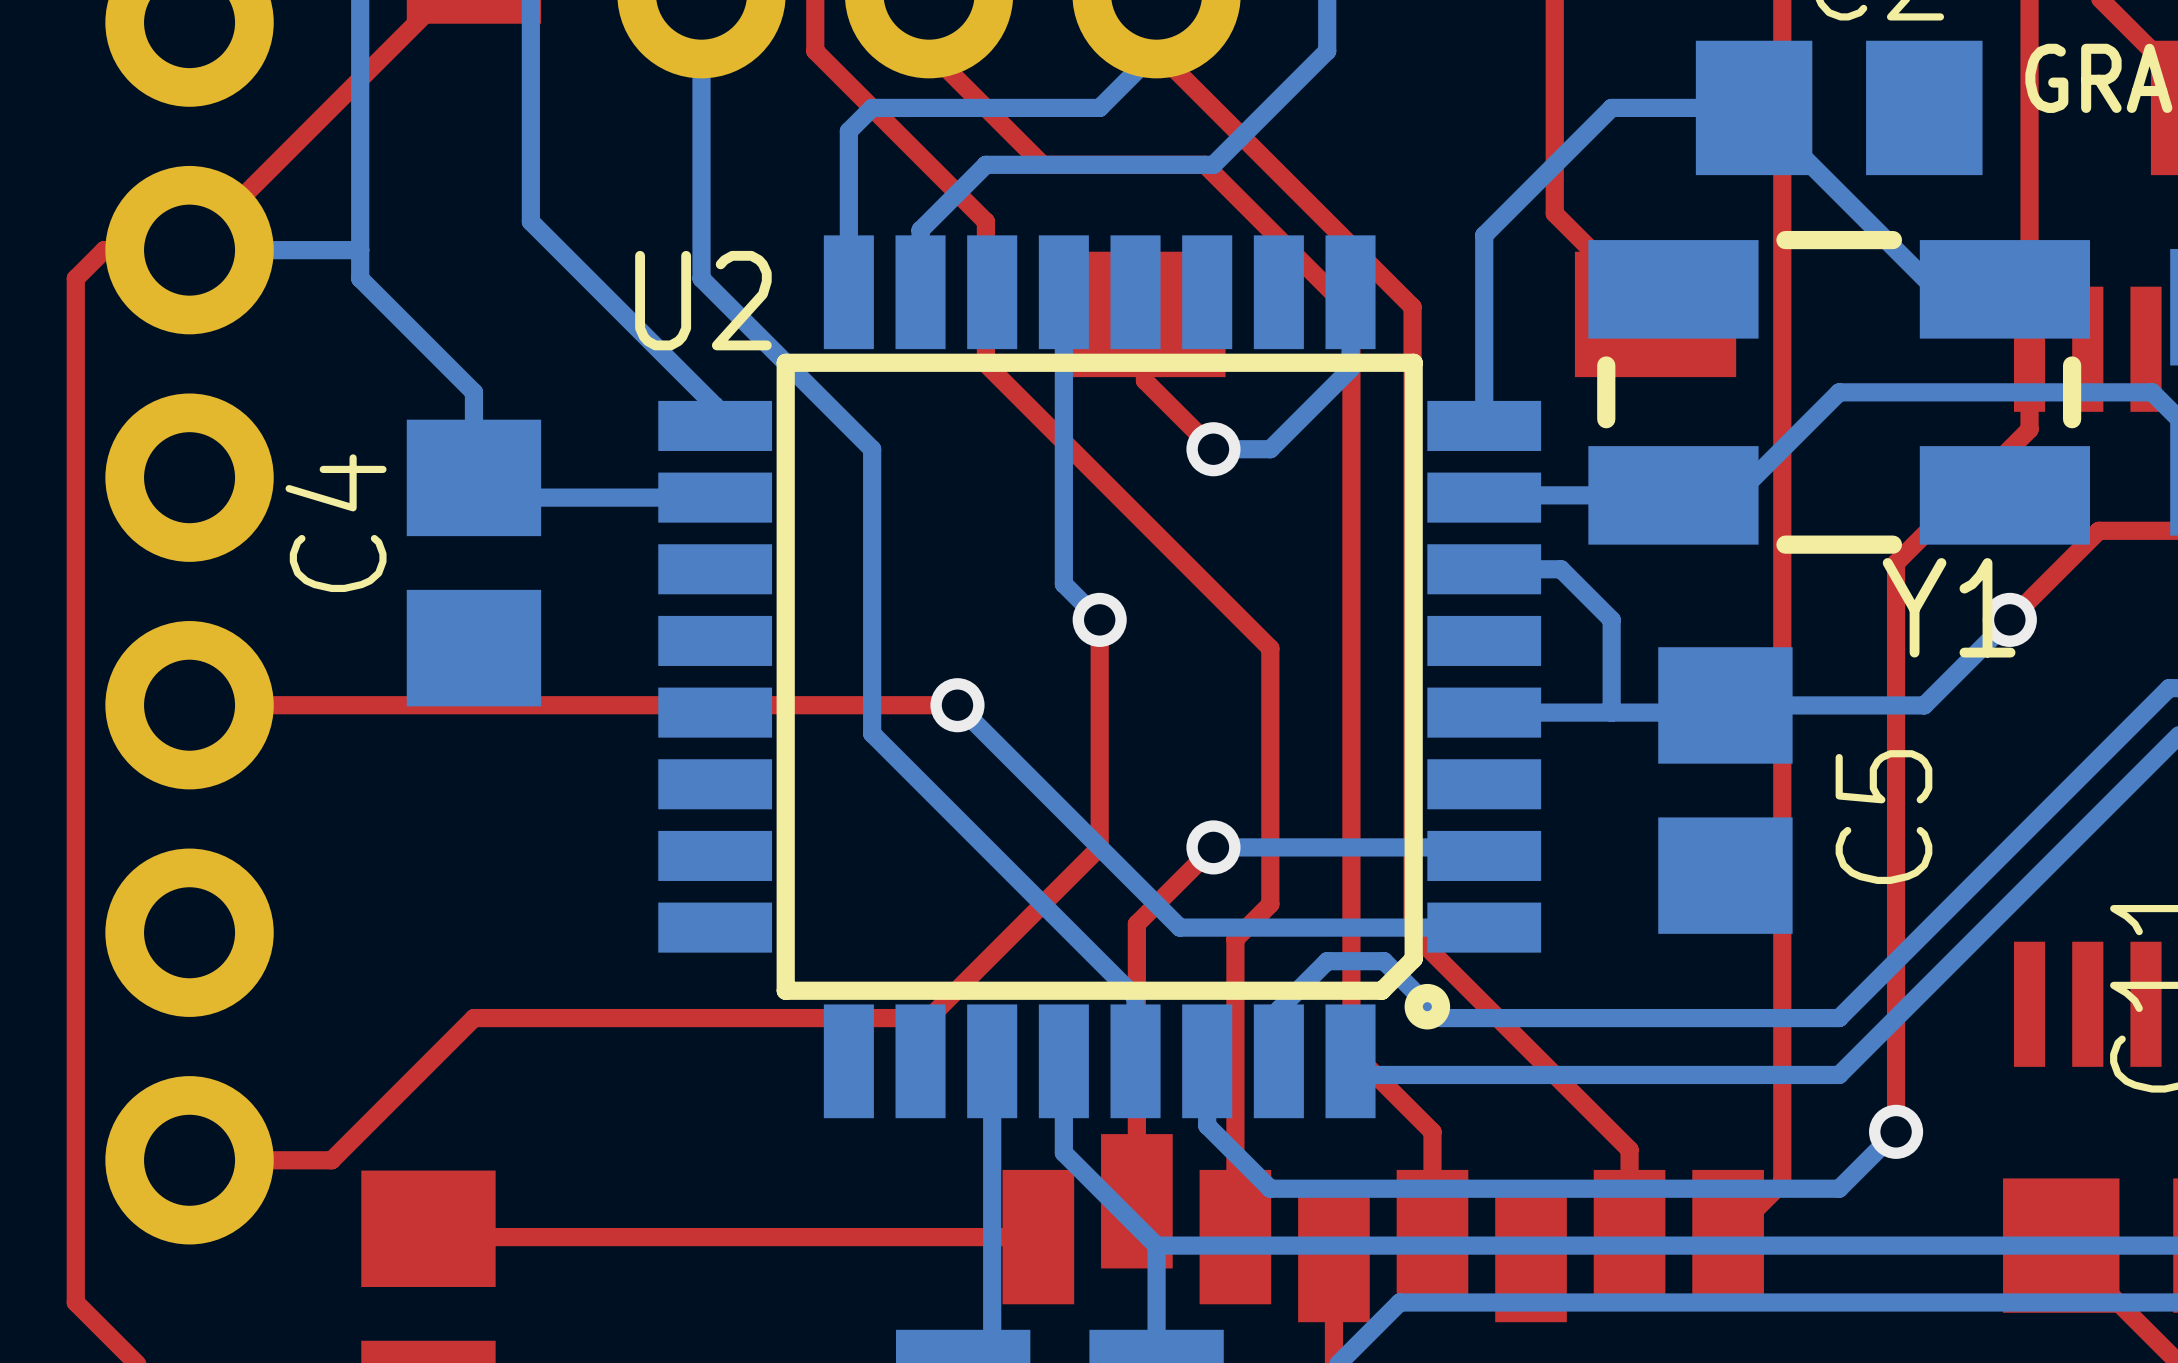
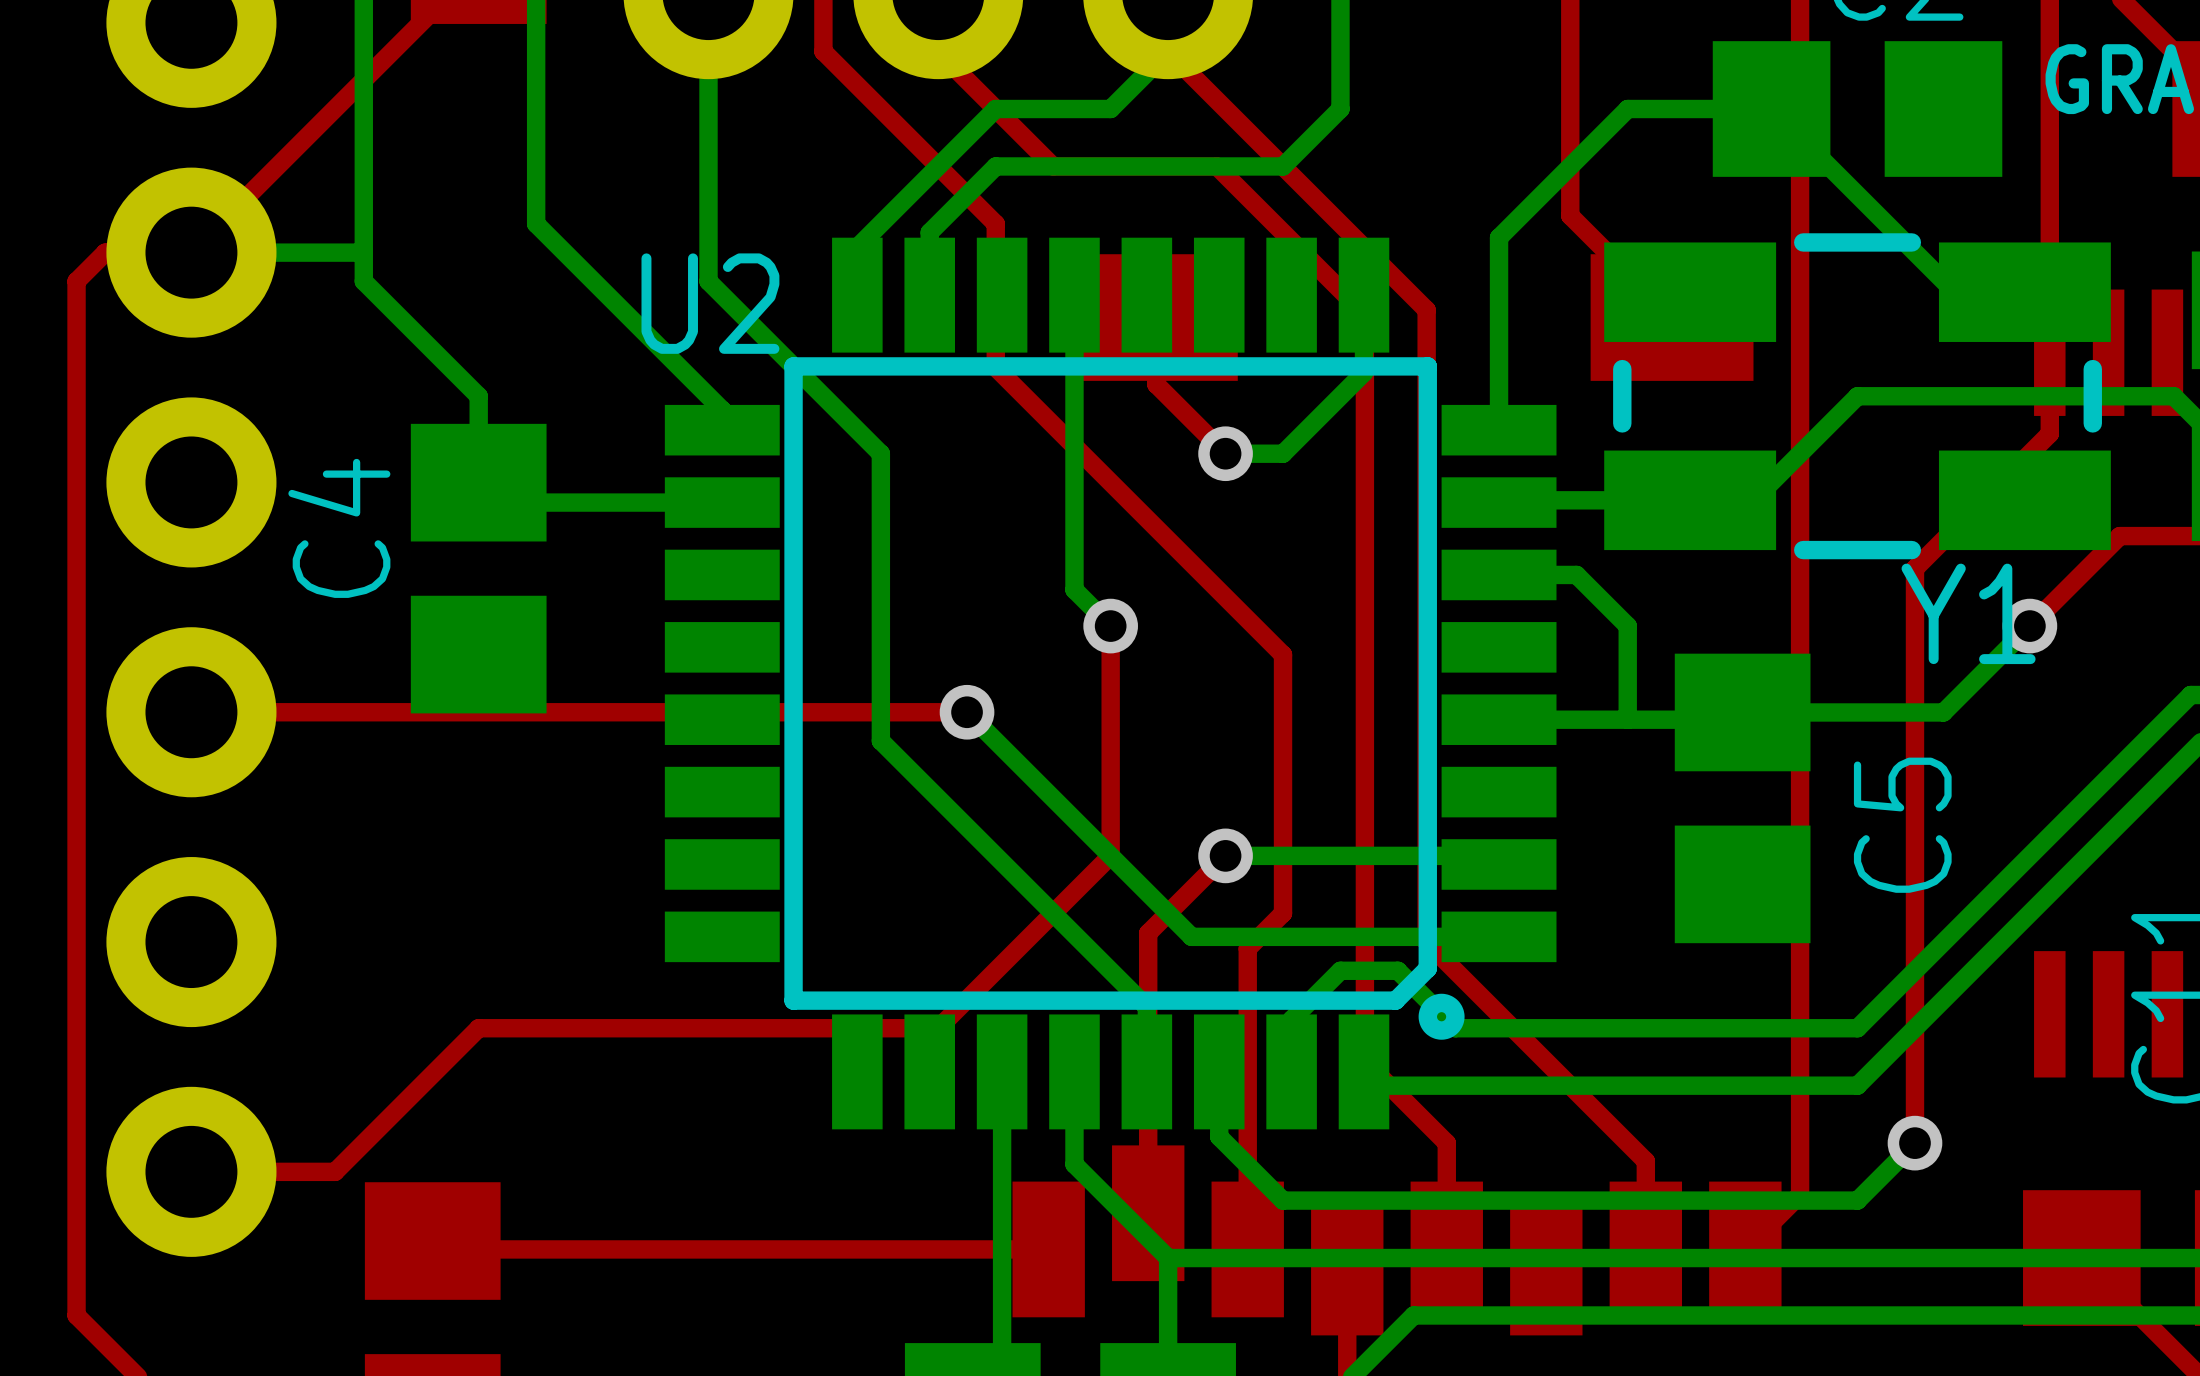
bottom track: (1327, 51) (1213, 164) -> (1340, 51) (1340, 109) (1283, 166) (1225, 166)
bottom track: (985, 107) (872, 107) (848, 131) (848, 244) -> (995, 109) (857, 247)

